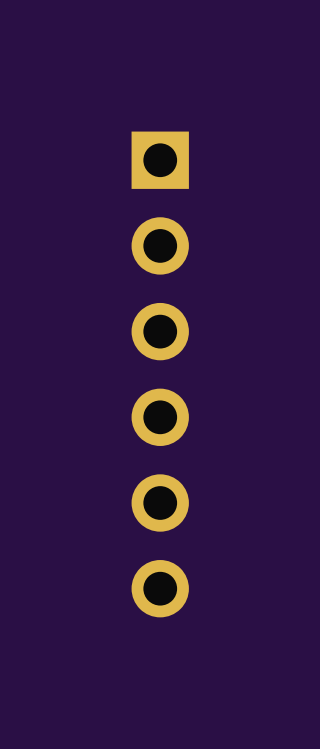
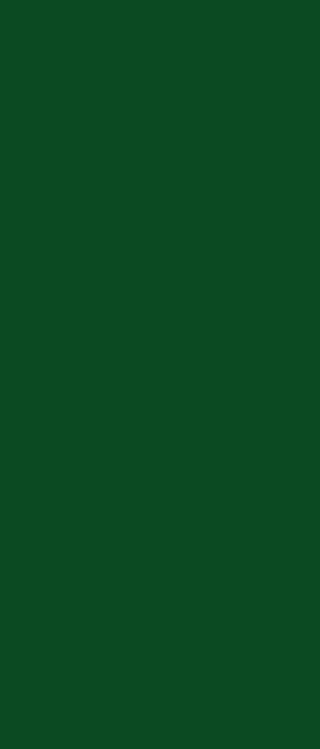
part: (160, 374) -> none

